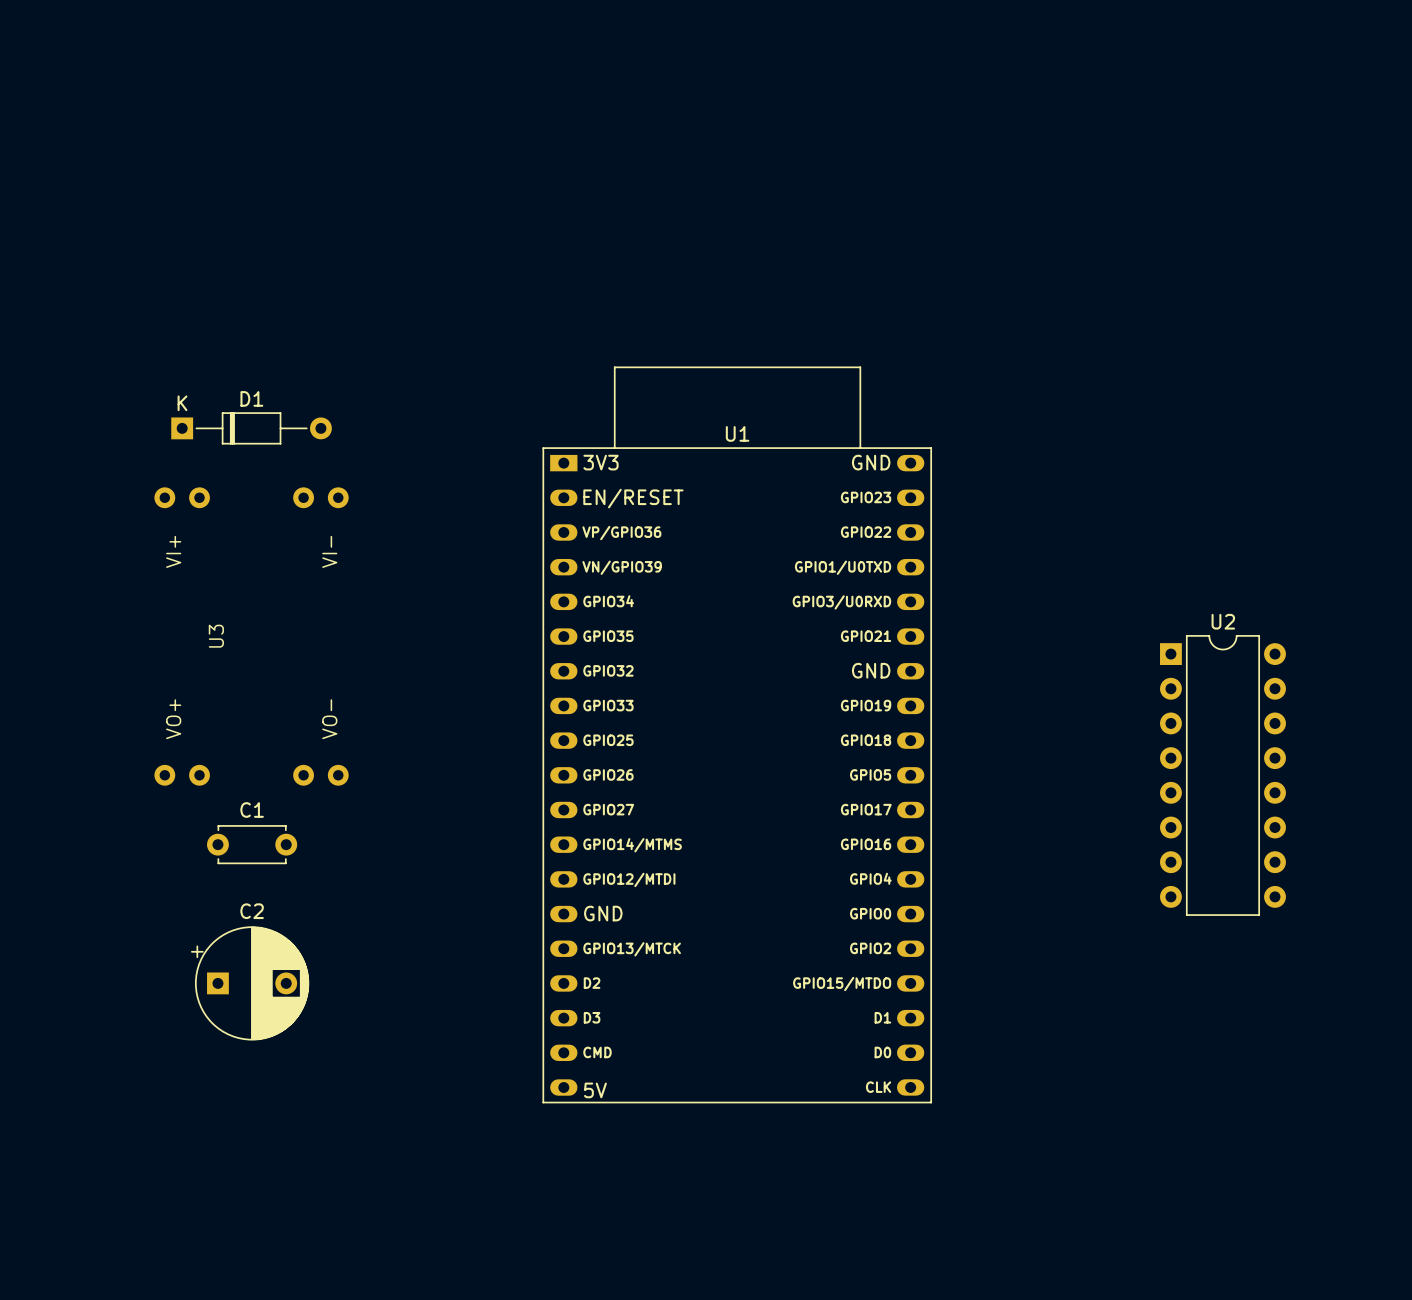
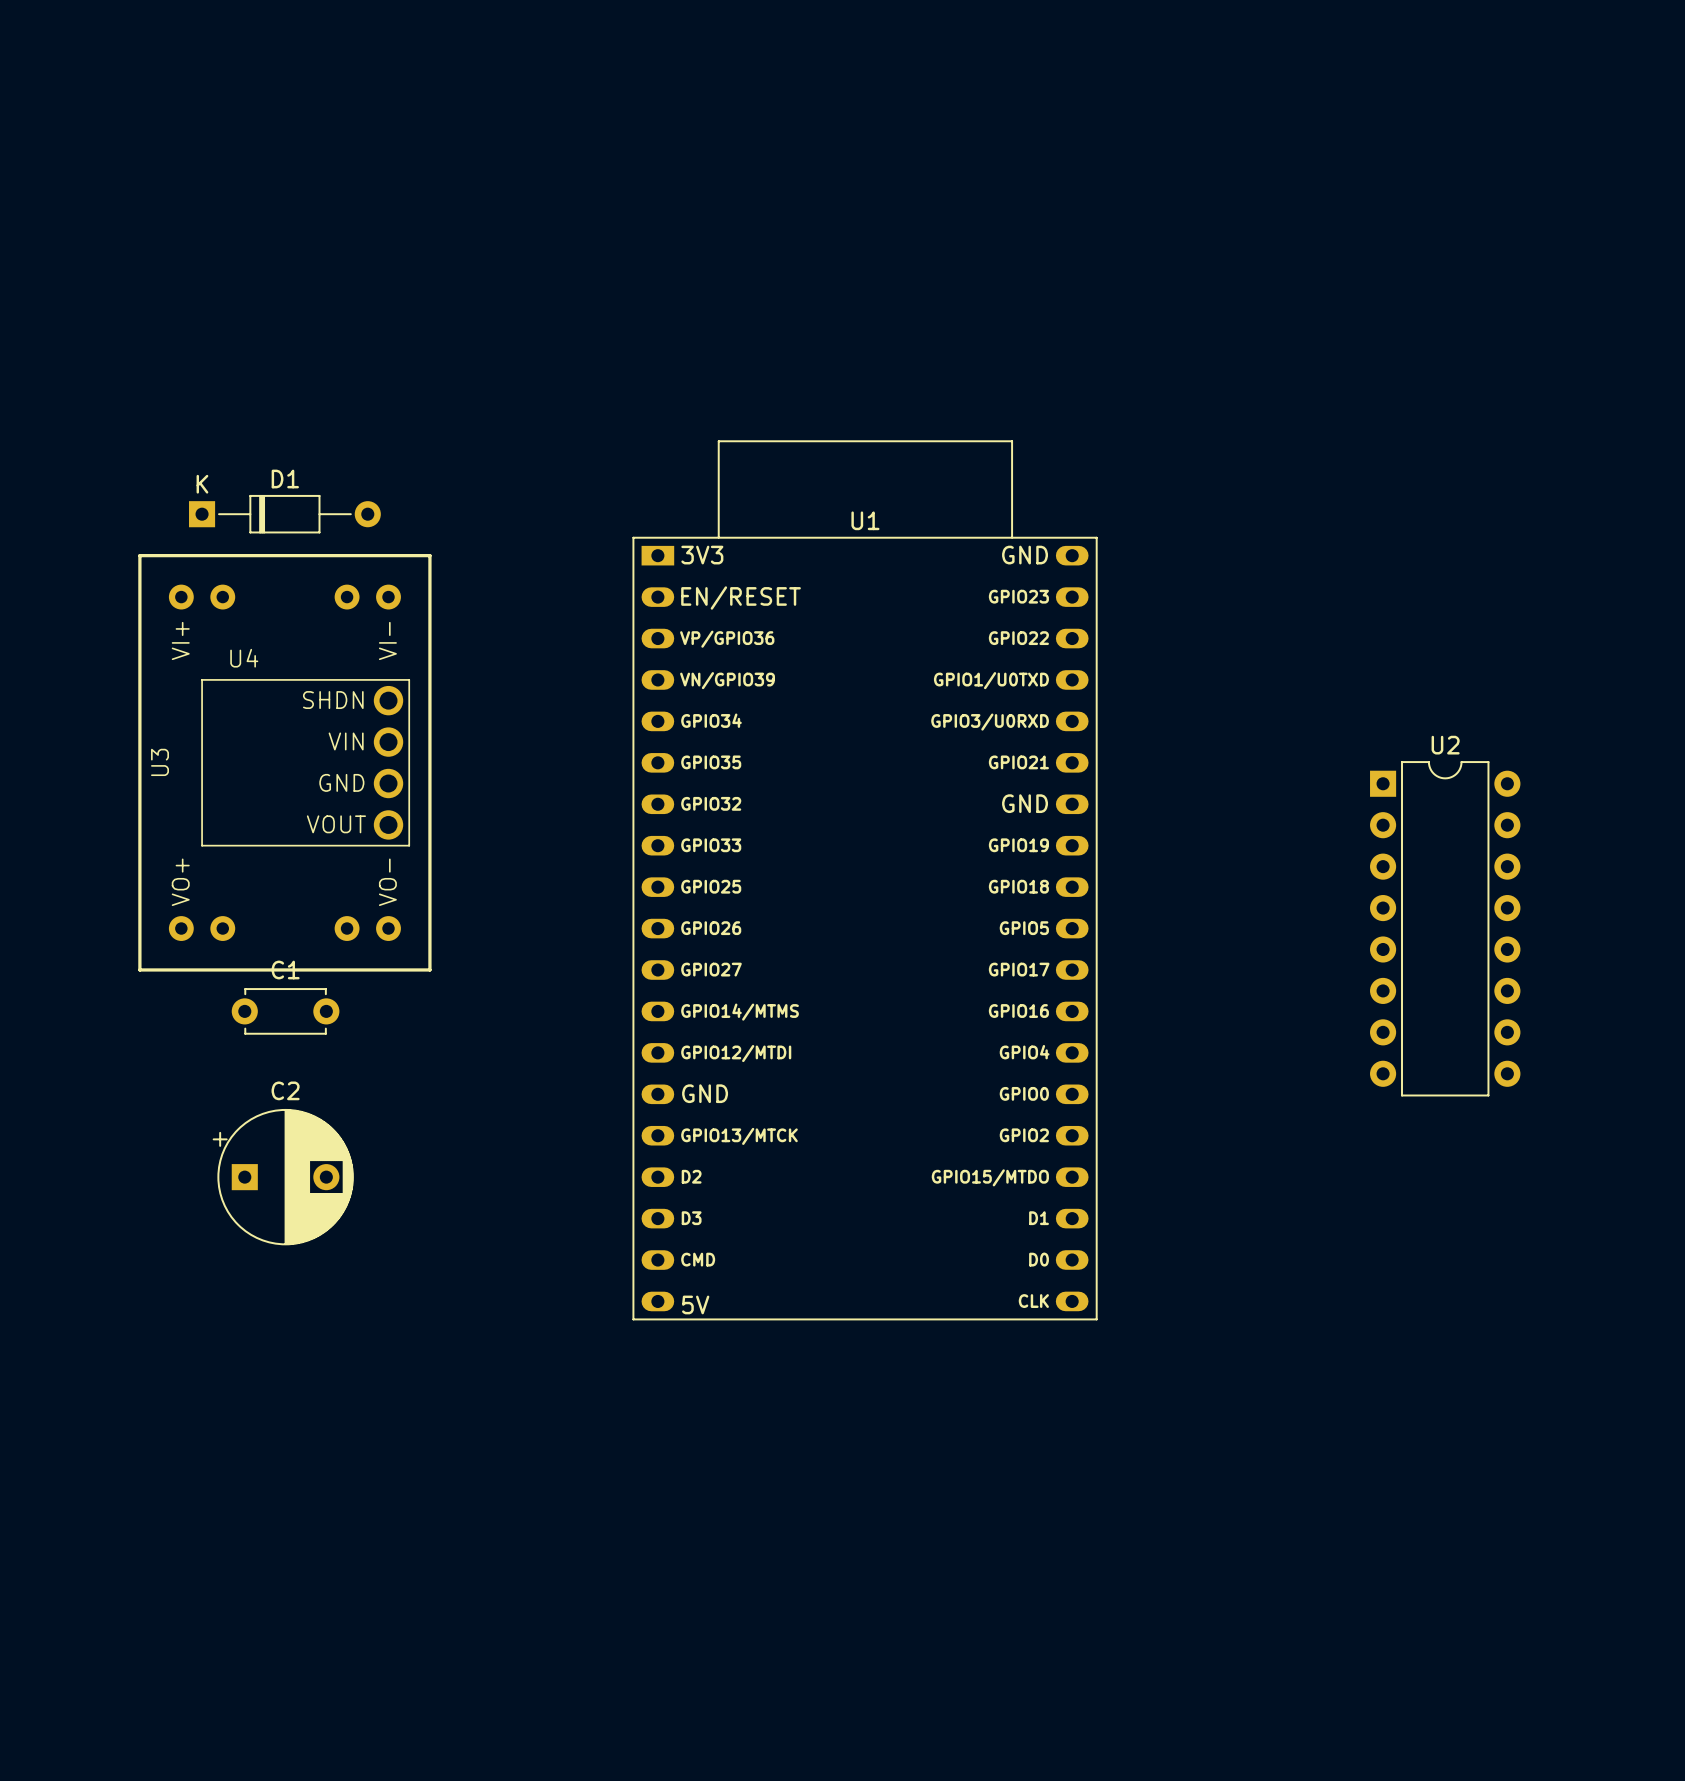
U3 footprint: [154, 487, 349, 786] -> [138, 553, 432, 972]
U3 name position: U3 (216, 636) -> U3 (160, 762)
U4: none -> (305, 762)

